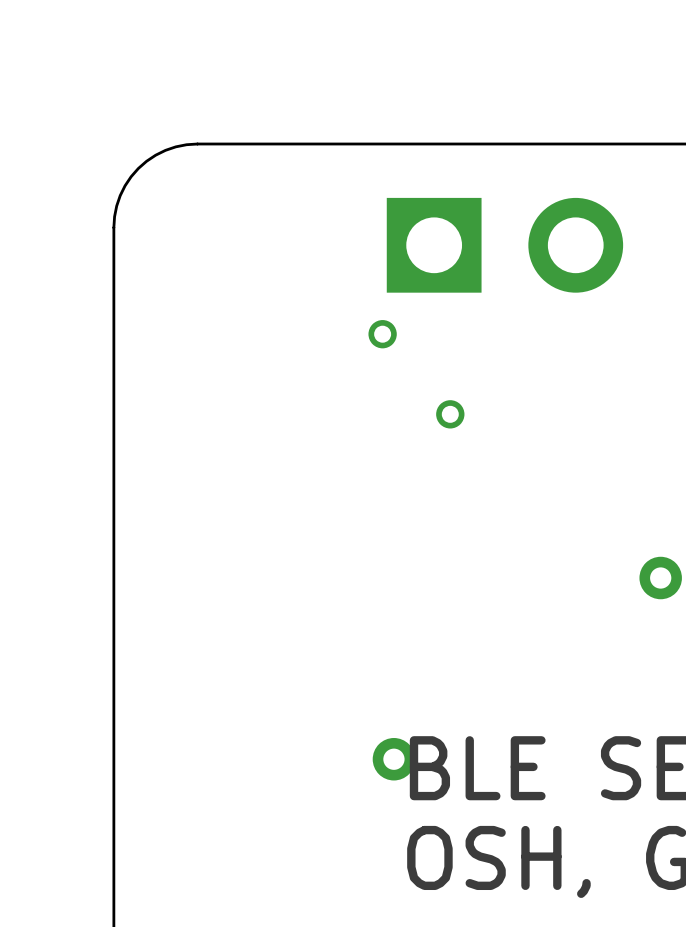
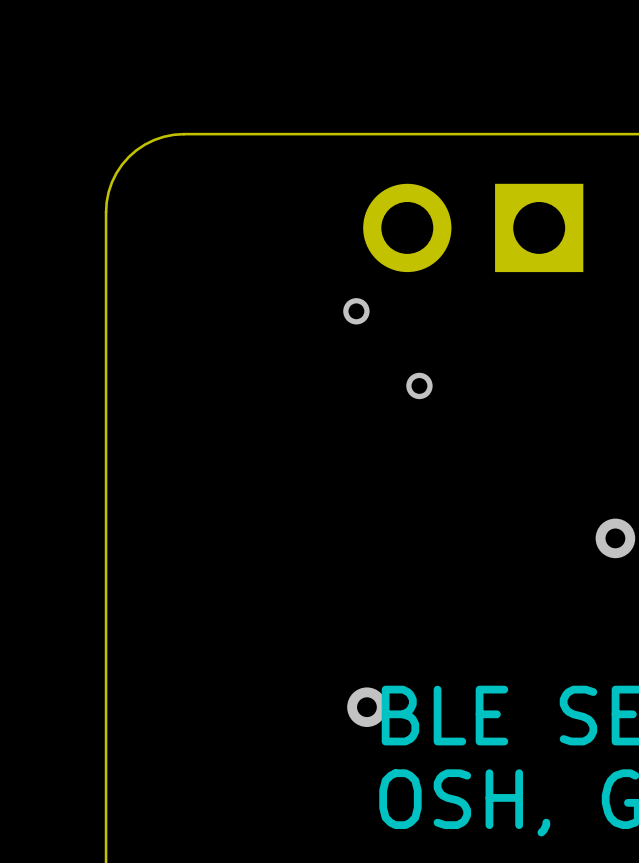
part rotation: 0° (504, 245) -> 180° (473, 227)

